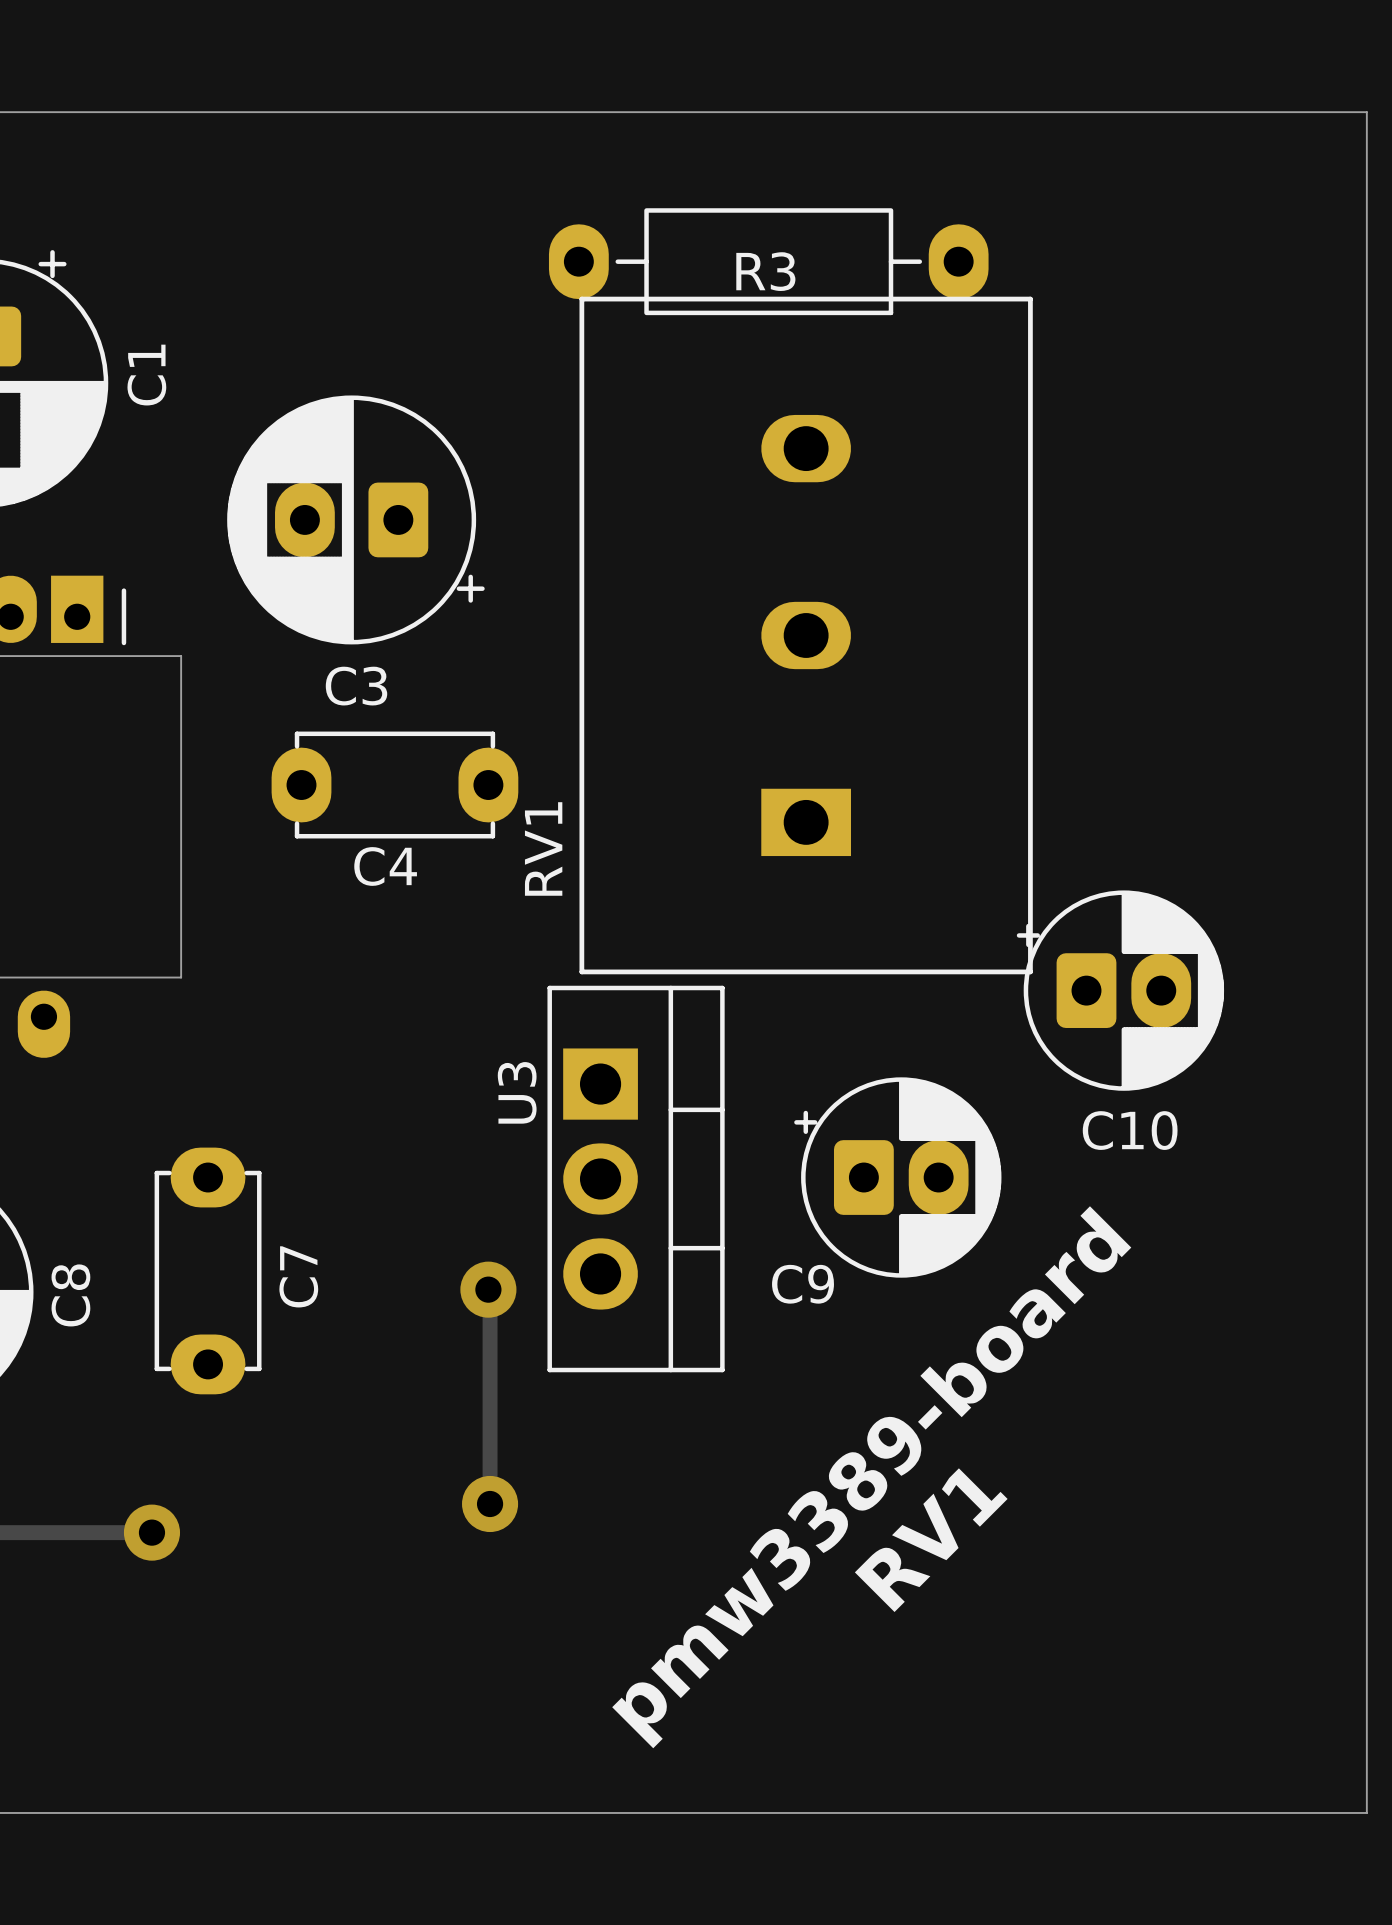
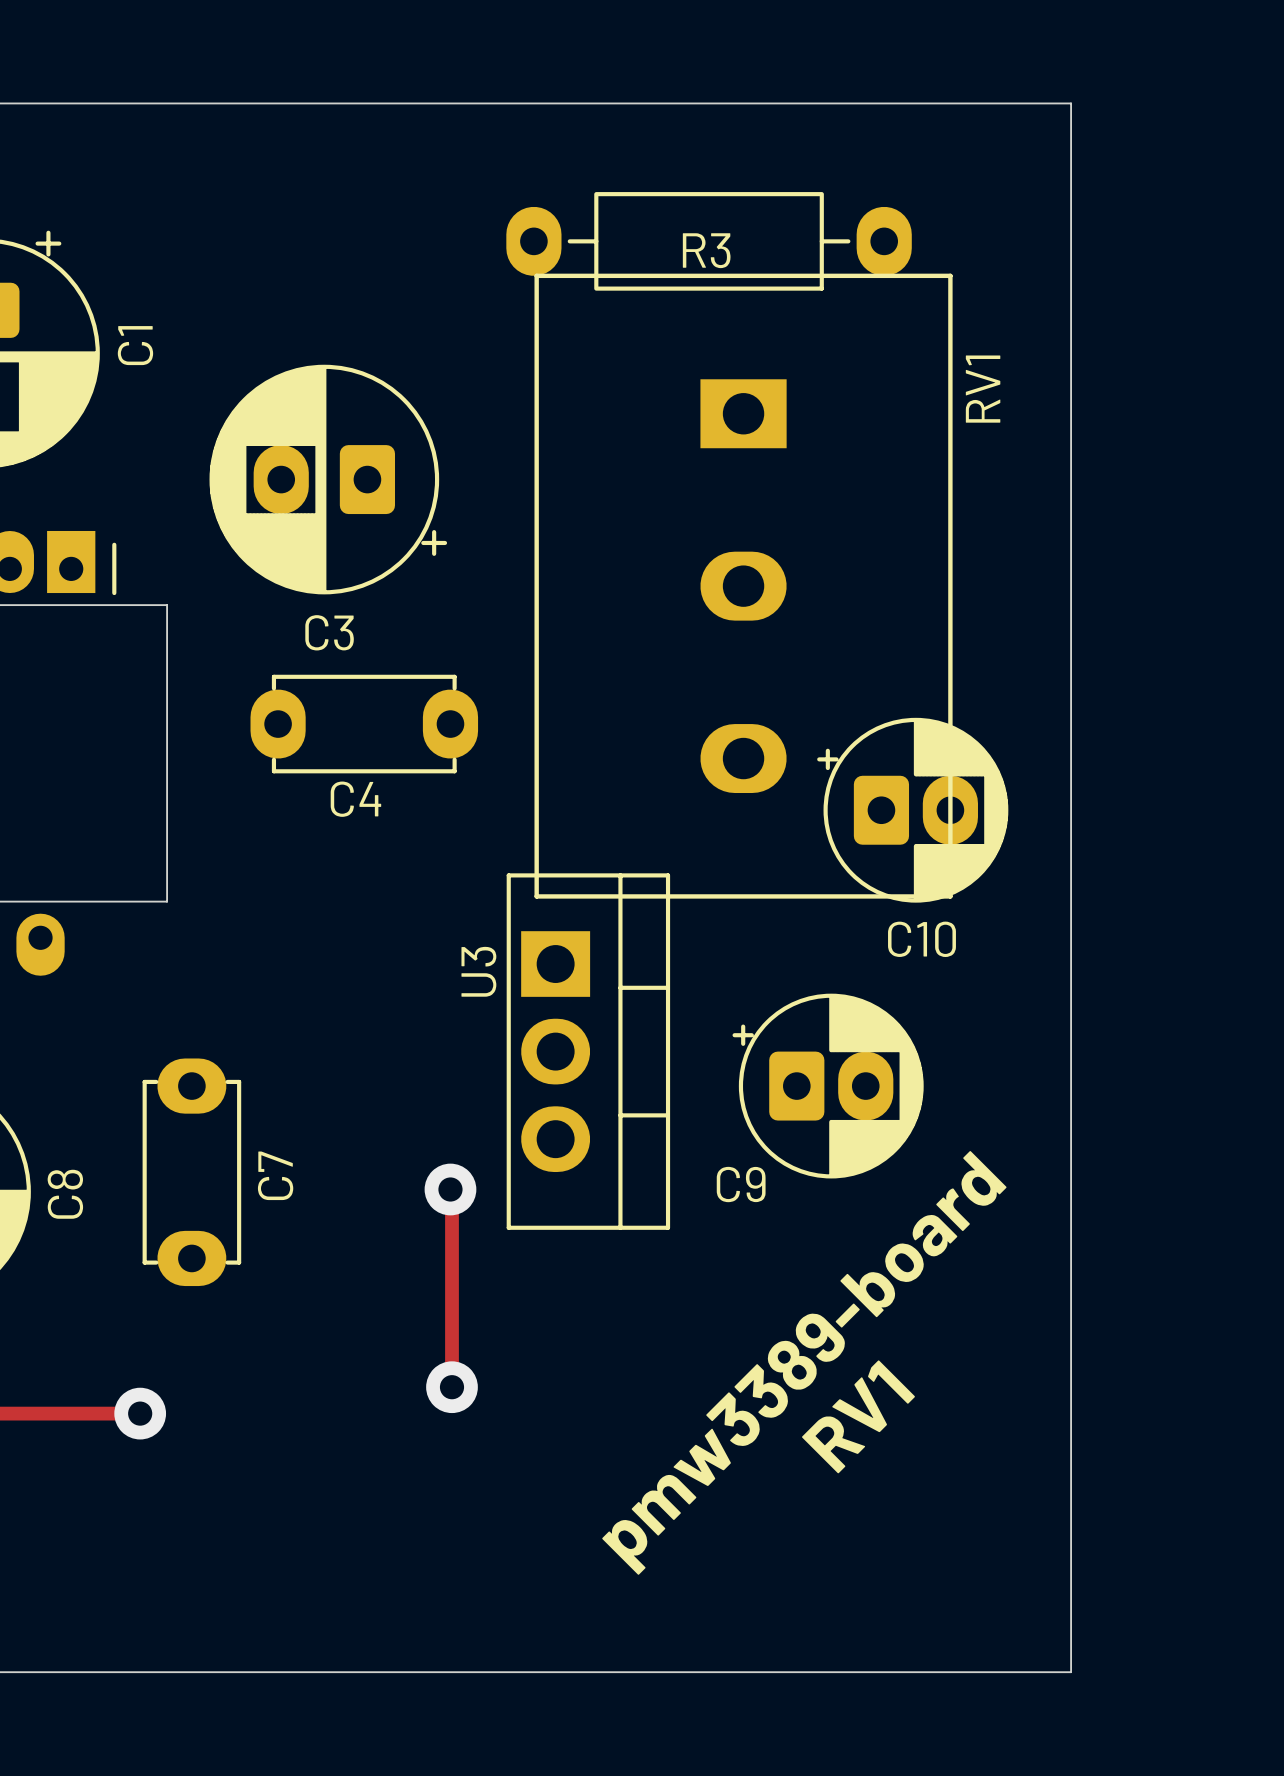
board edge: (1161, 112) (1366, 112) (1366, 1812) (1161, 1812) -> (1071, 103) (1071, 1672)
RV1 footprint: [579, 296, 1033, 975] -> [534, 273, 953, 899]
RV1 name position: RV1 (543, 848) -> RV1 (983, 389)
C10 position: (1120, 990) -> (912, 810)
U3 position: (636, 1179) -> (588, 1051)

